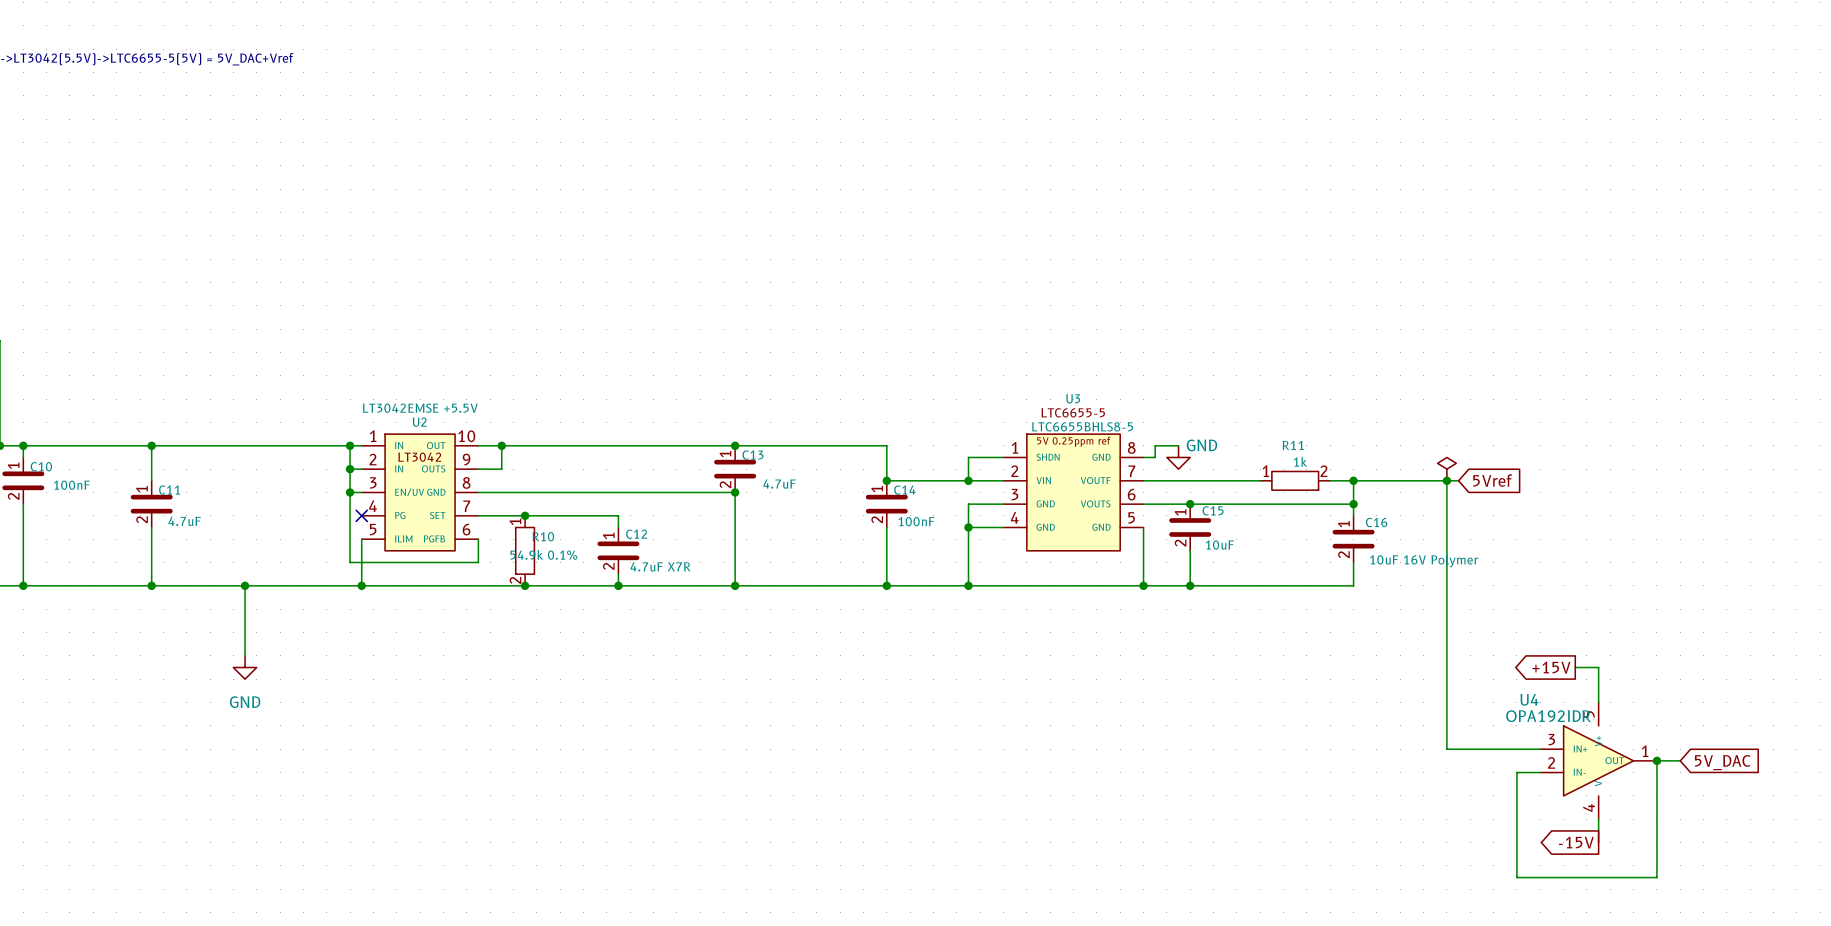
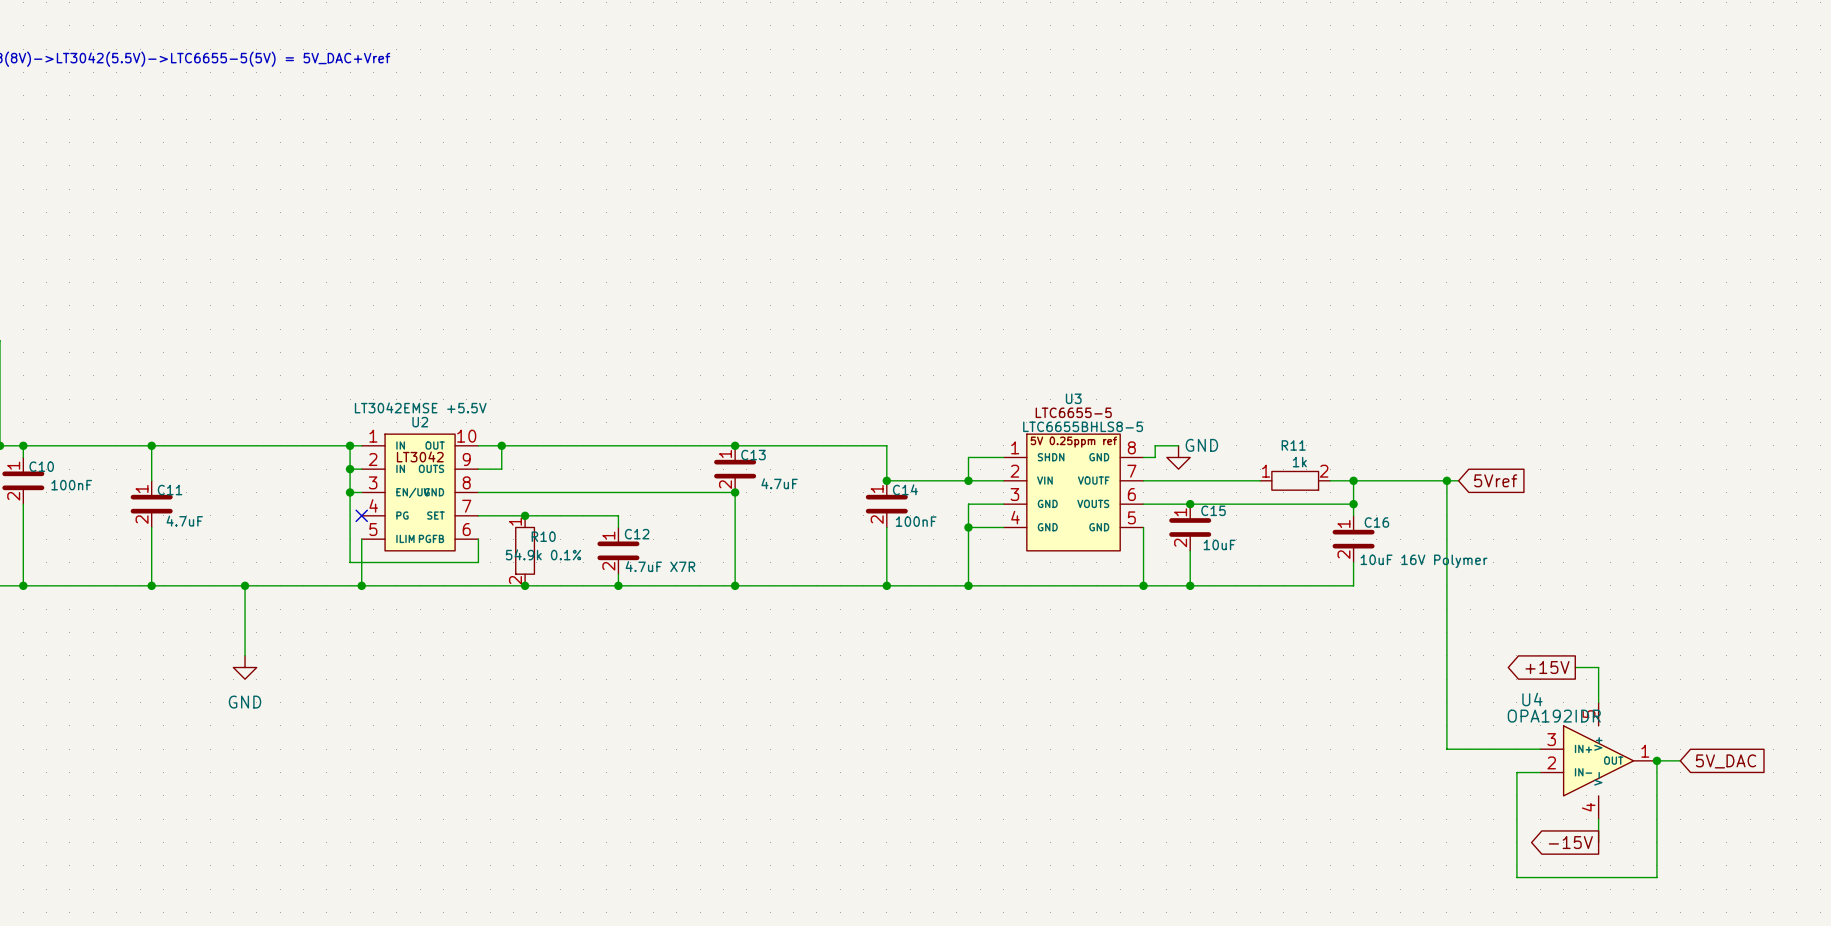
power symbol: (1446, 469) -> none

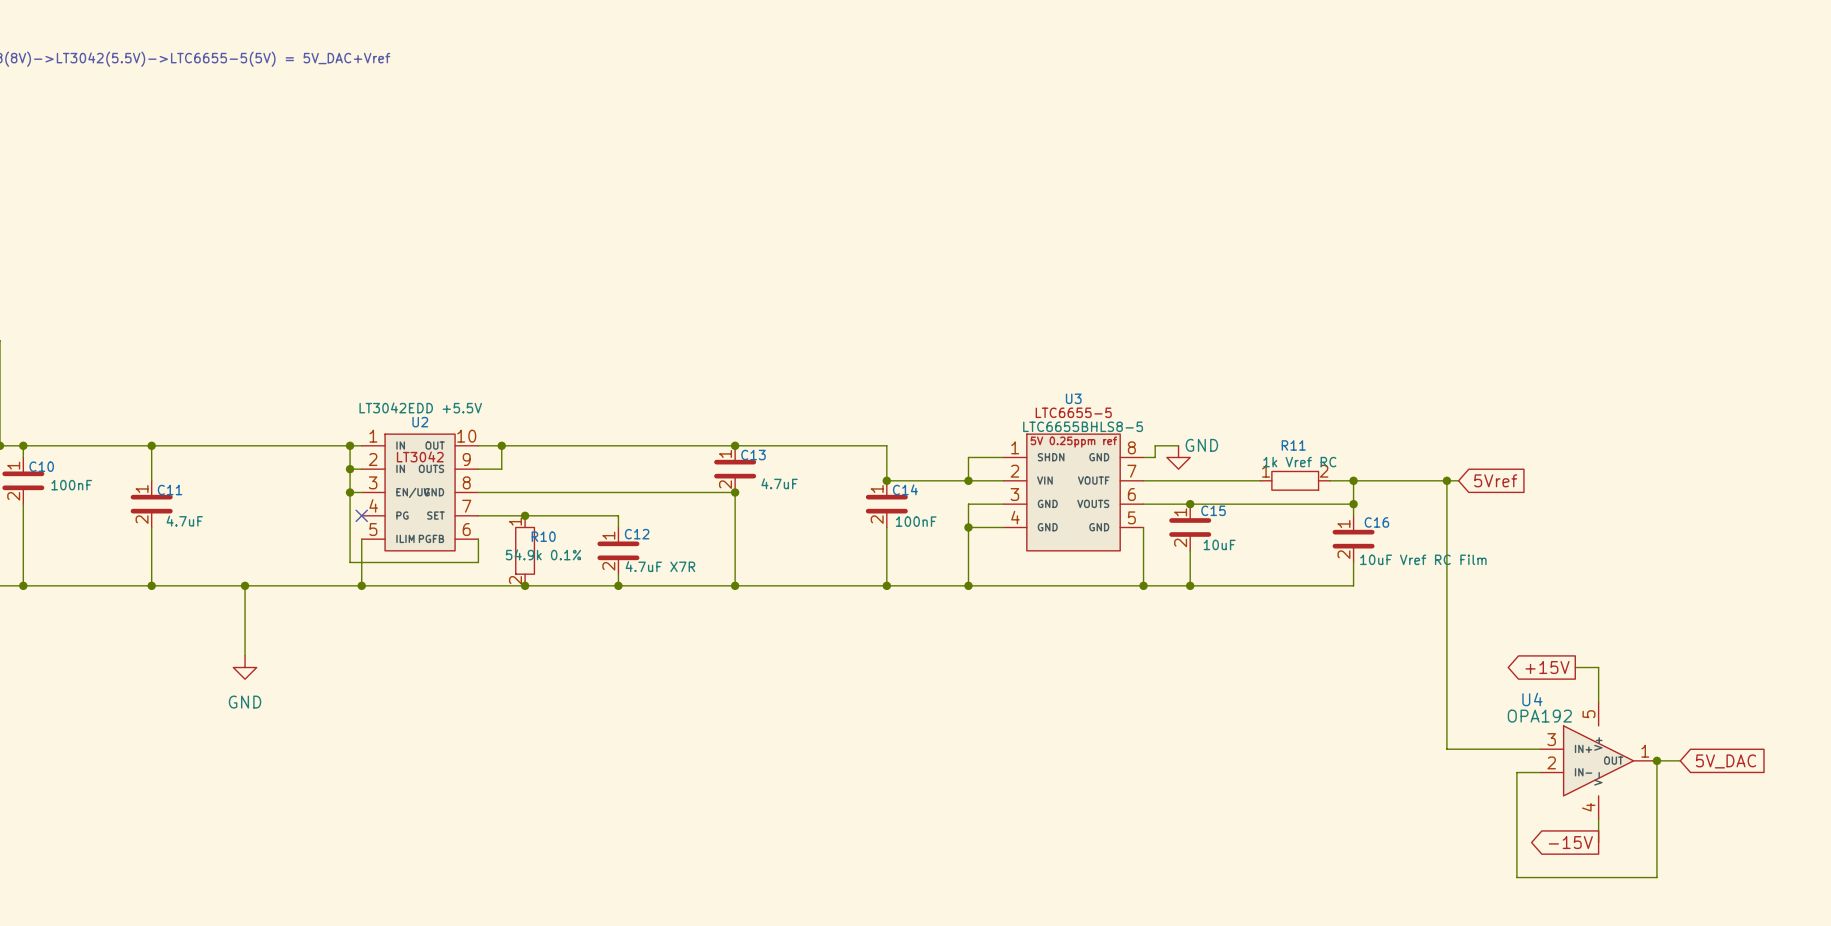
U2 value: LT3042EMSE +5.5V (420, 407) -> LT3042EDD +5.5V (420, 407)
R11 value: 1k (1299, 462) -> 1k Vref RC (1299, 462)
C16 value: 10uF 16V Polymer (1424, 561) -> 10uF Vref RC Film (1423, 559)
U4 value: OPA192IDR (1554, 716) -> OPA192 (1539, 716)

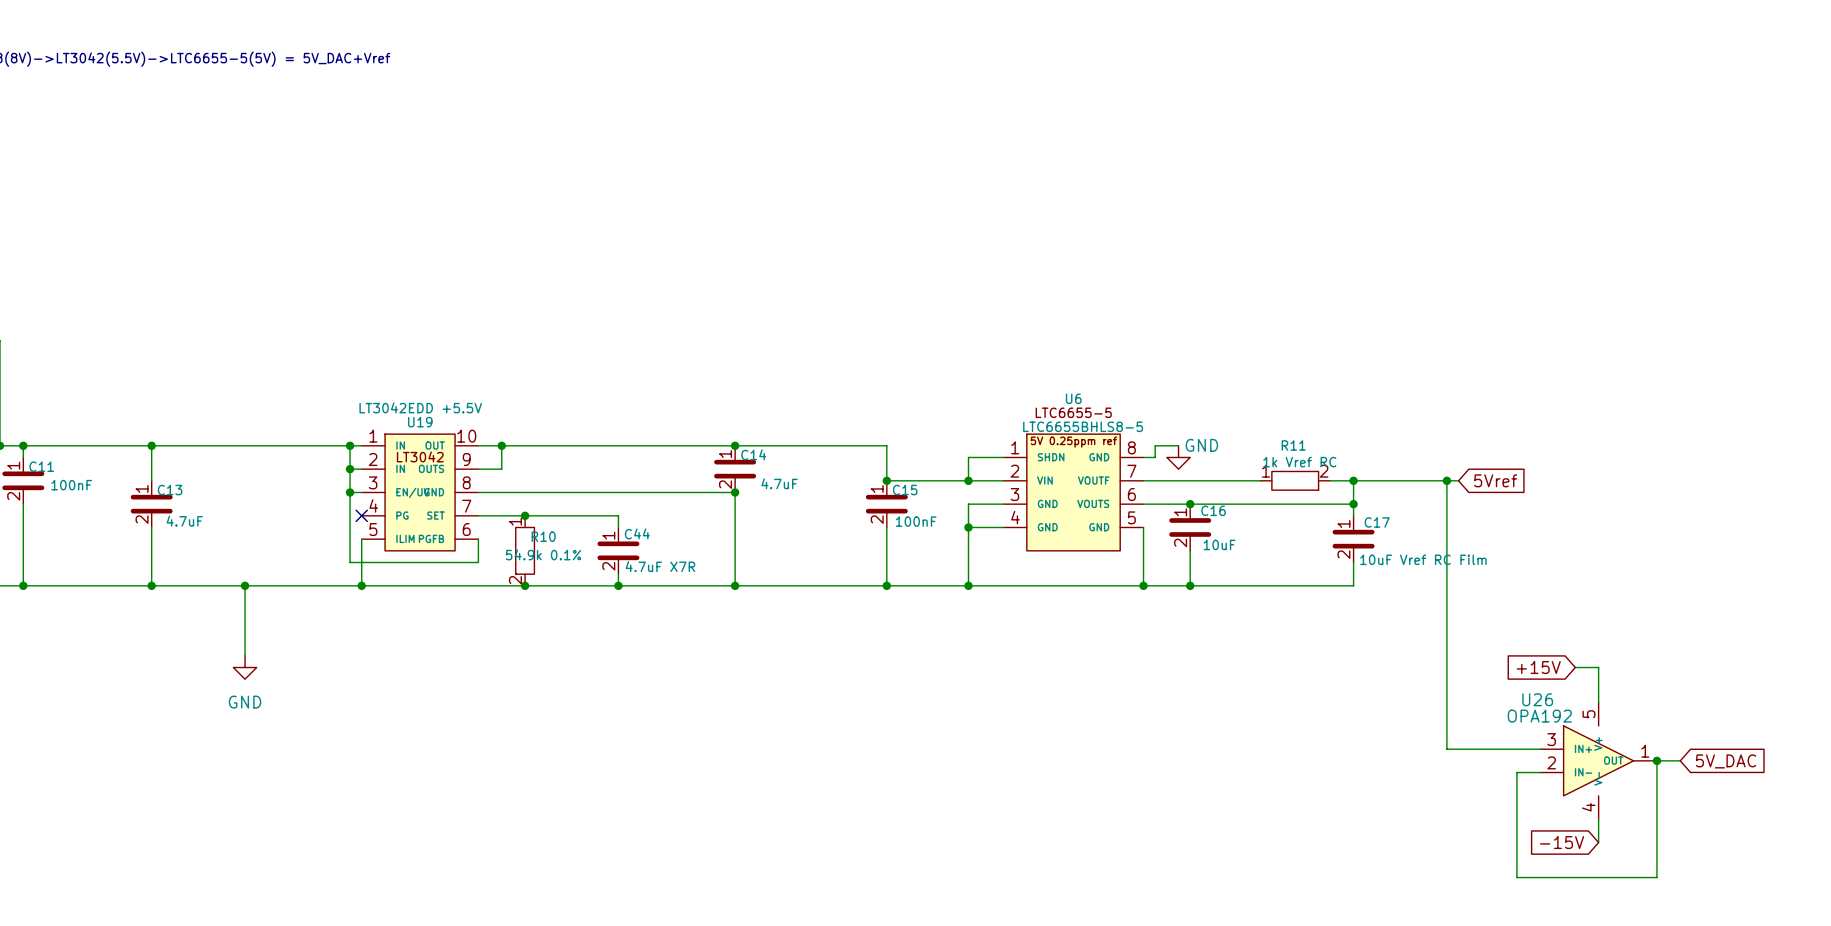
U3 name: U3 (1073, 398) -> U6 (1073, 398)
U2 name: U2 (420, 422) -> U19 (420, 422)
C13 name: C13 (753, 455) -> C14 (753, 454)
C10 name: C10 (41, 466) -> C11 (41, 466)
C14 name: C14 (905, 489) -> C15 (905, 490)
C11 name: C11 (170, 490) -> C13 (170, 490)
C15 name: C15 (1213, 510) -> C16 (1213, 510)
C16 name: C16 (1376, 522) -> C17 (1377, 522)
C12 name: C12 (637, 534) -> C44 (637, 533)
global label shape: output (1547, 667) -> input (1538, 667)
U4 name: U4 (1532, 699) -> U26 (1537, 699)
global label shape: output (1570, 842) -> input (1562, 842)

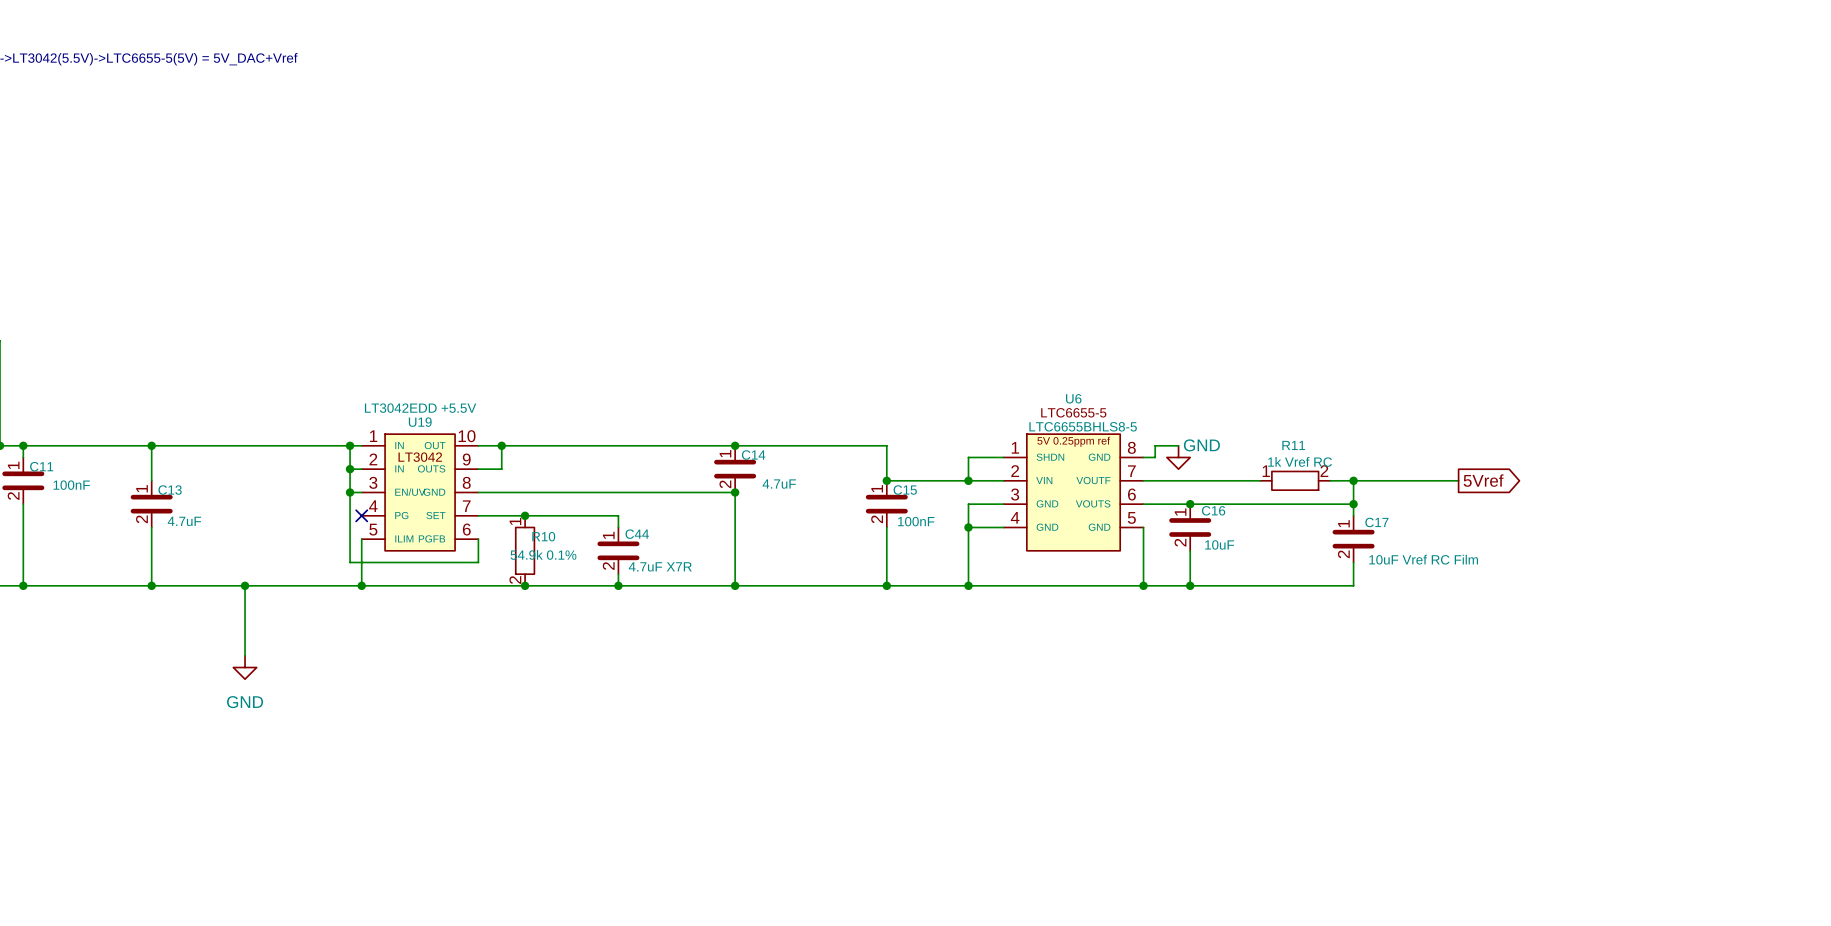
wire: (1446, 480) (1446, 749) (1540, 749) -> none
junction: (1446, 480) -> none
global label shape: input (1495, 480) -> output (1483, 480)
global label: +15V (1538, 667) -> none
wire: (1575, 667) (1598, 667) (1598, 702) -> none
U26: OPA192 (1598, 760) -> none
junction: (1656, 760) -> none
wire: (1680, 760) (1656, 760) (1656, 877) (1516, 877) (1516, 772) (1540, 772) -> none
global label: 5V_DAC (1726, 761) -> none
wire: (1598, 819) (1598, 842) -> none
global label: -15V (1562, 842) -> none

